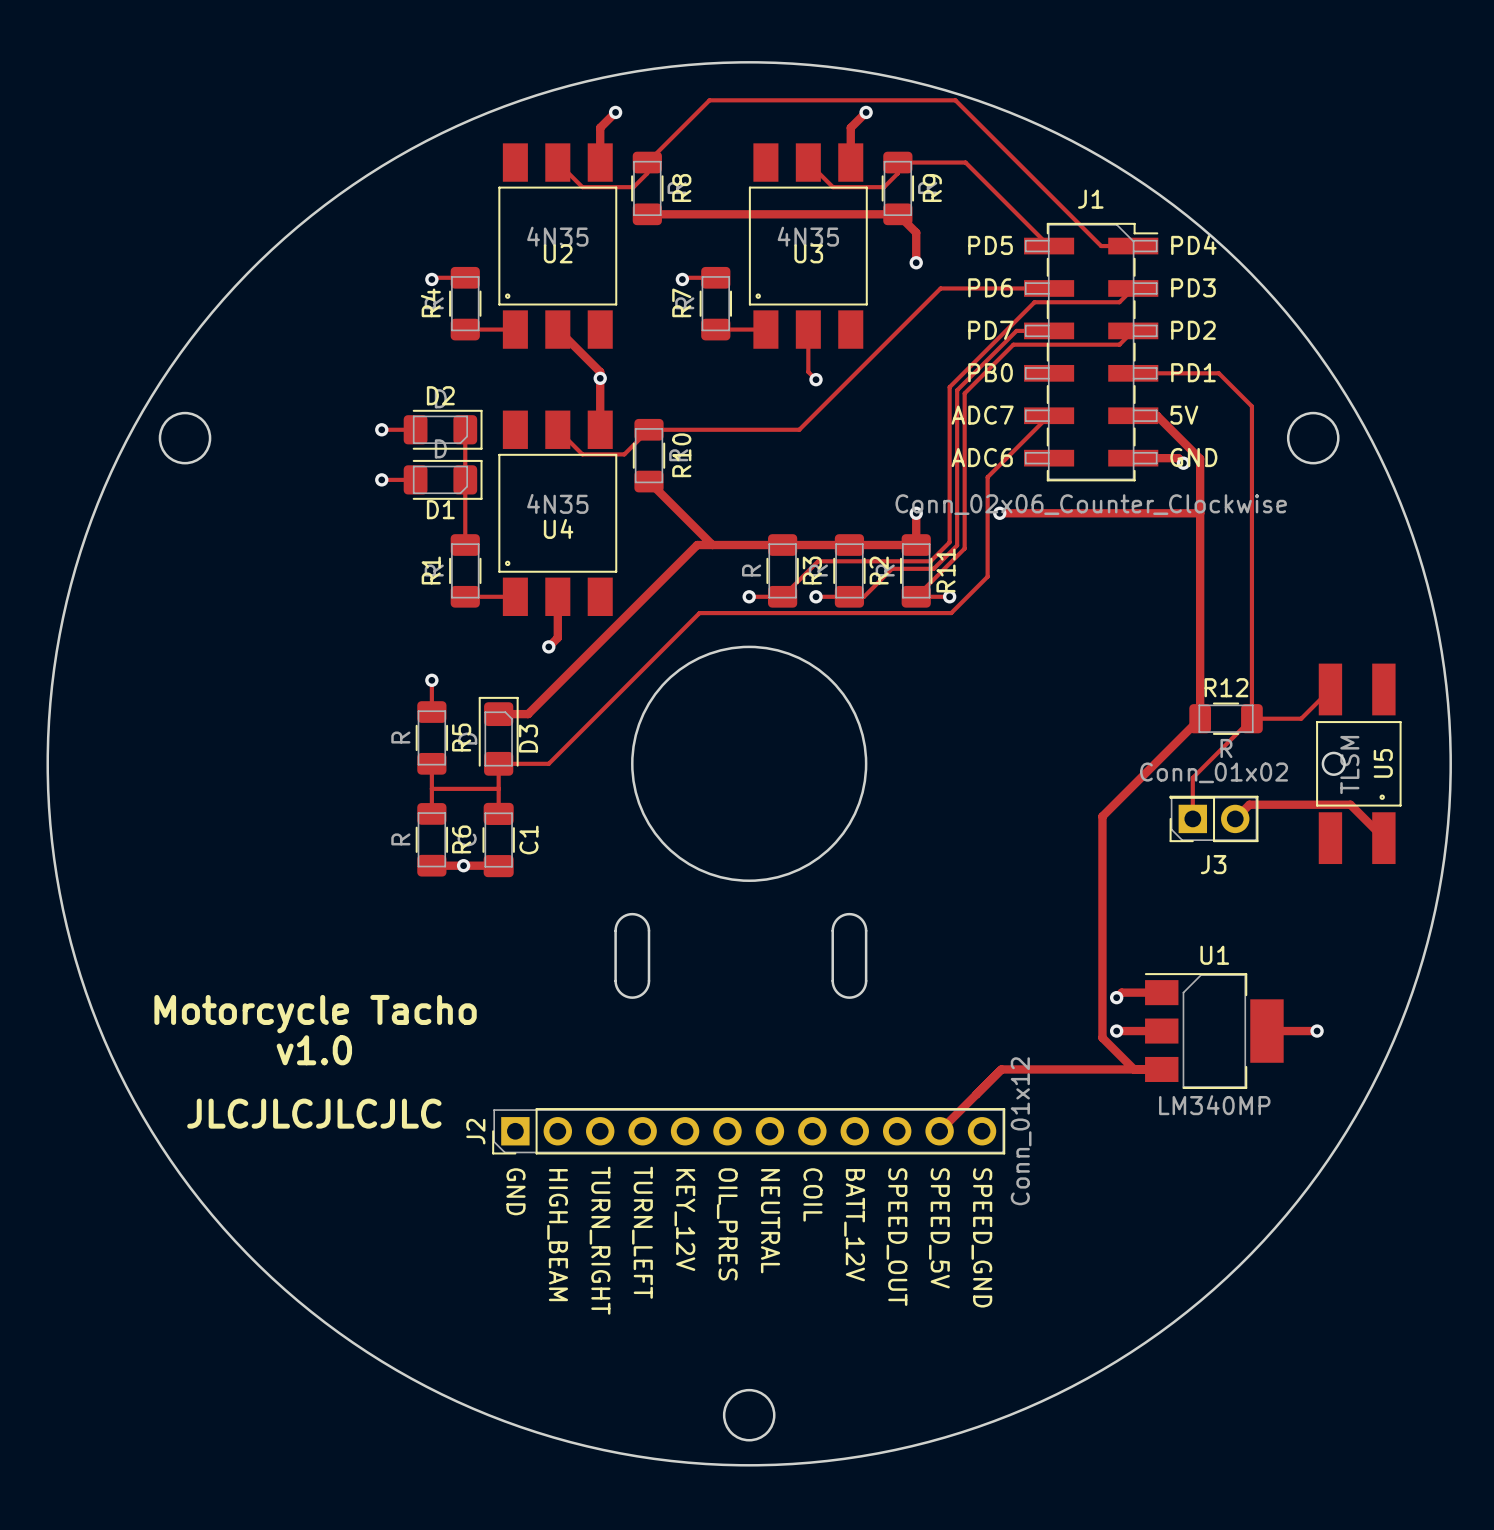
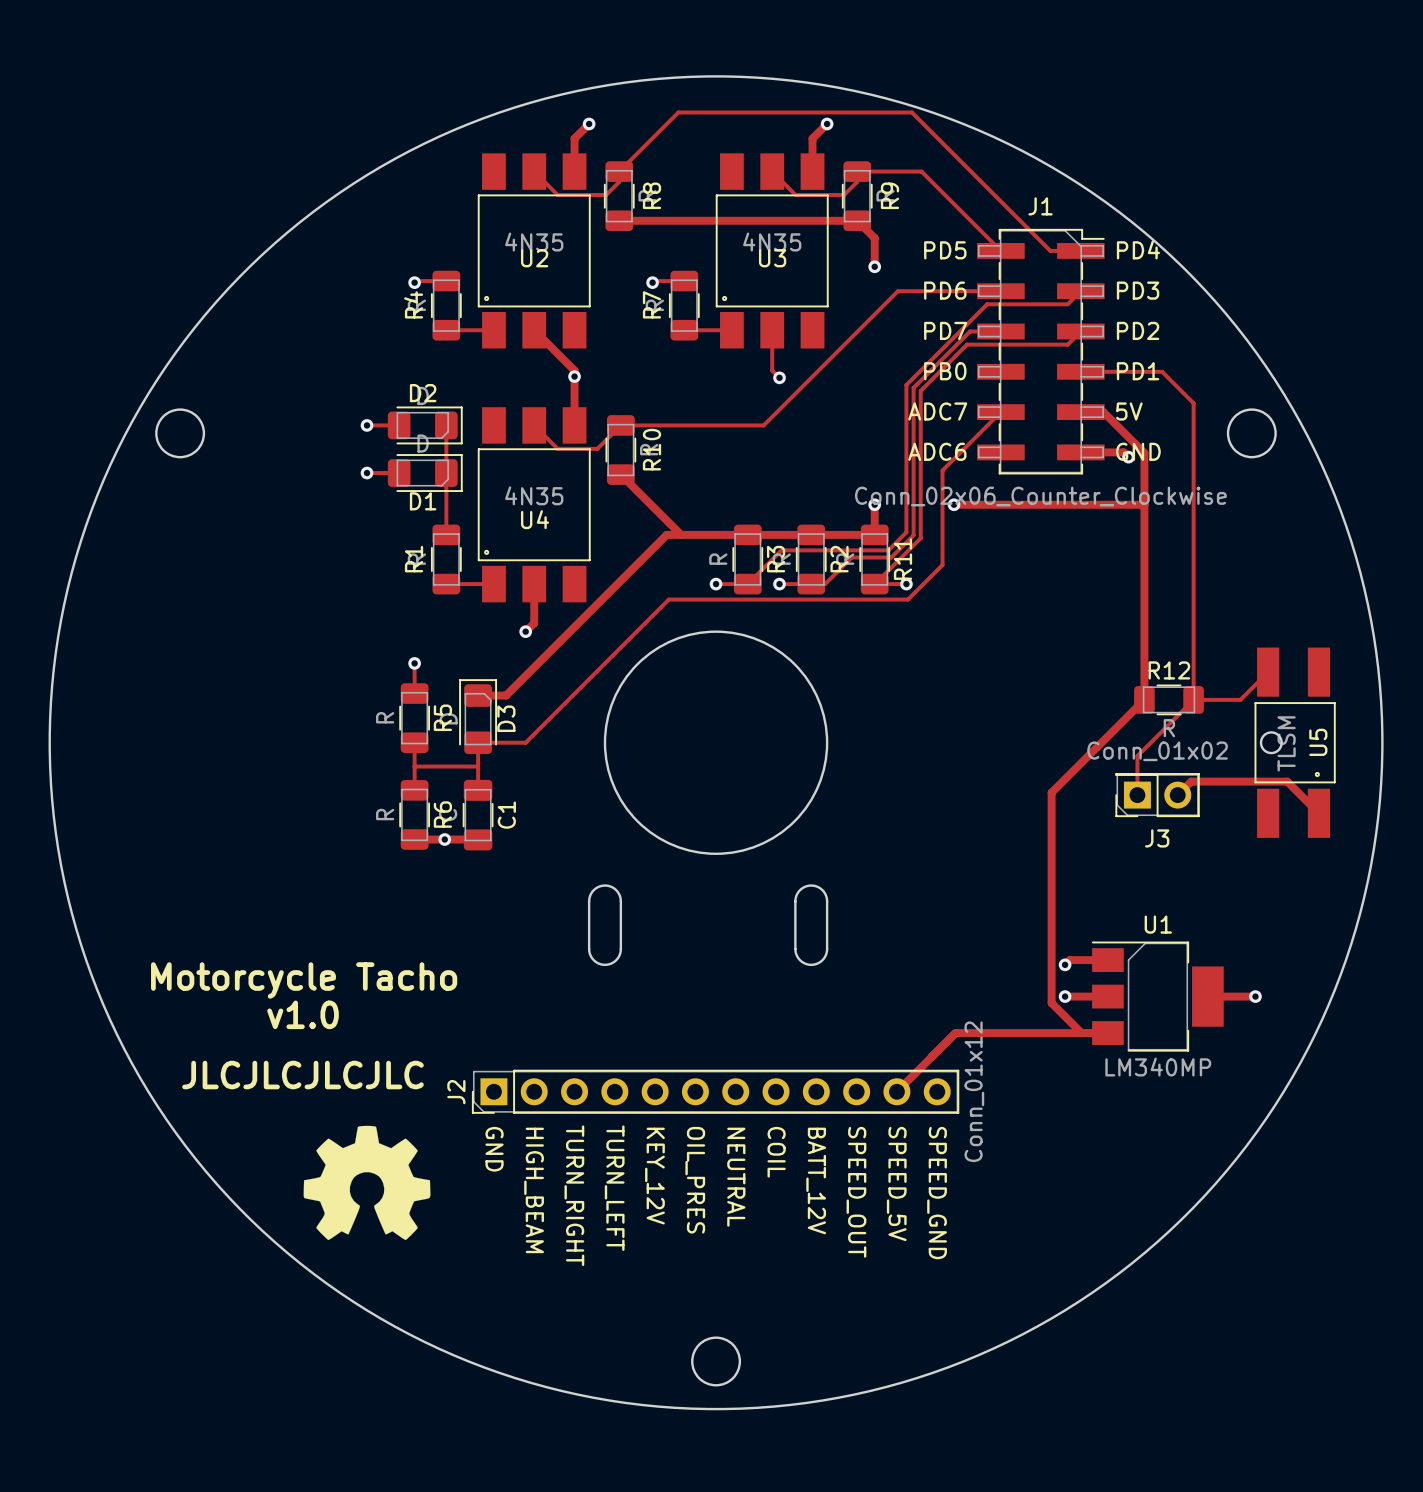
drawing: none -> [303, 1125, 431, 1241]

